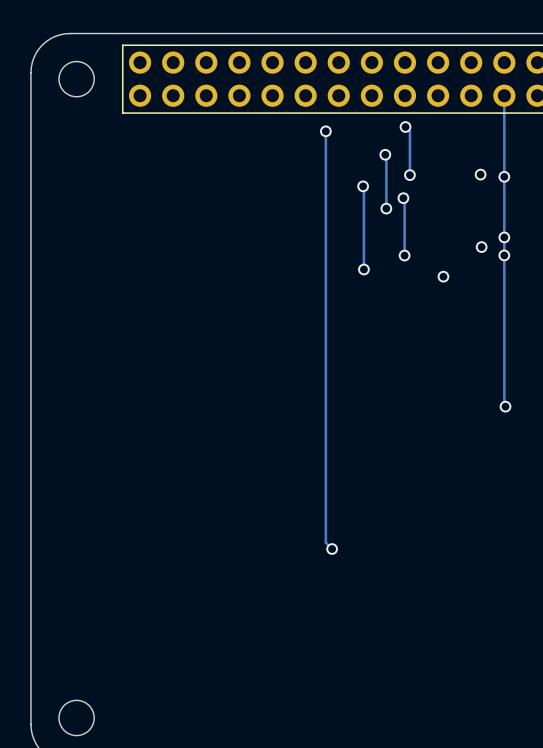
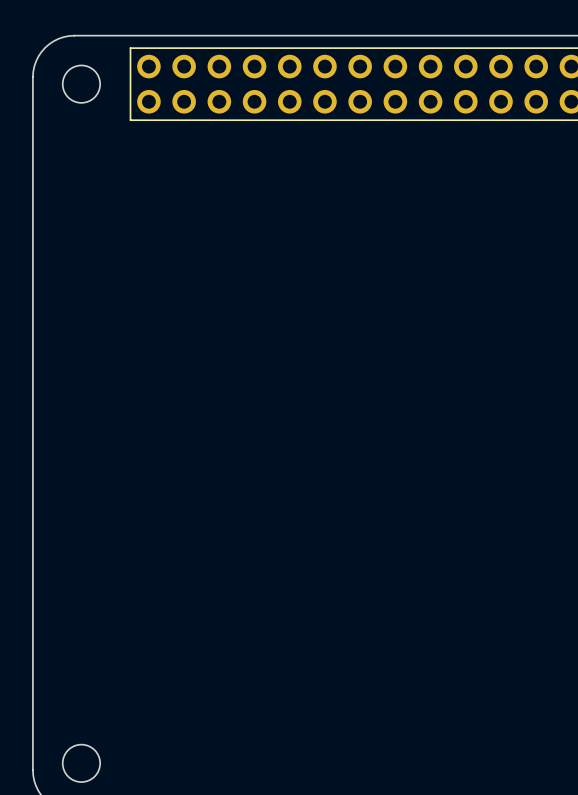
track: (504, 95) (505, 406) -> none
track: (404, 127) (409, 131) (409, 175) -> none
via: (405, 127) -> none
track: (325, 131) (325, 542) (332, 549) -> none
via: (325, 131) -> none
track: (385, 154) (386, 208) -> none
via: (385, 154) -> none
via: (480, 174) -> none
via: (409, 175) -> none
via: (504, 176) -> none
track: (363, 186) (363, 269) -> none
via: (363, 186) -> none
track: (403, 198) (404, 255) -> none
via: (403, 198) -> none
via: (386, 208) -> none
via: (504, 237) -> none
via: (481, 247) -> none
via: (404, 255) -> none
via: (504, 255) -> none
via: (363, 269) -> none
via: (443, 276) -> none
via: (505, 406) -> none
via: (332, 549) -> none

